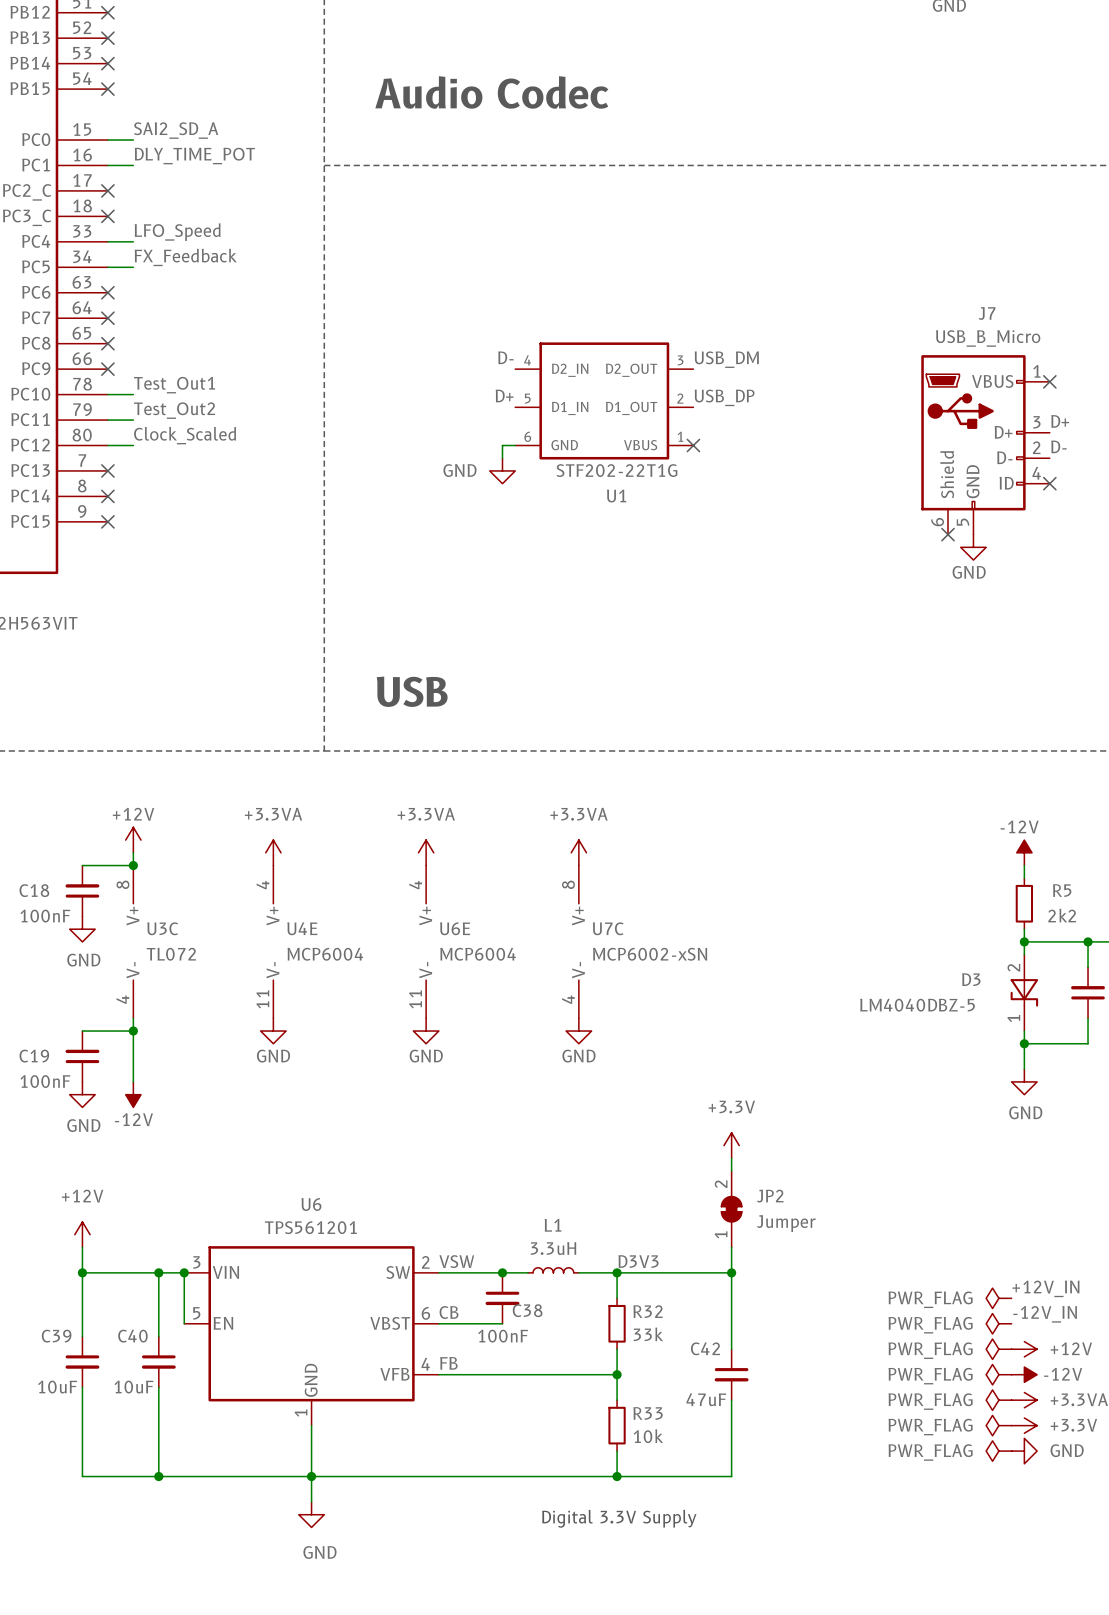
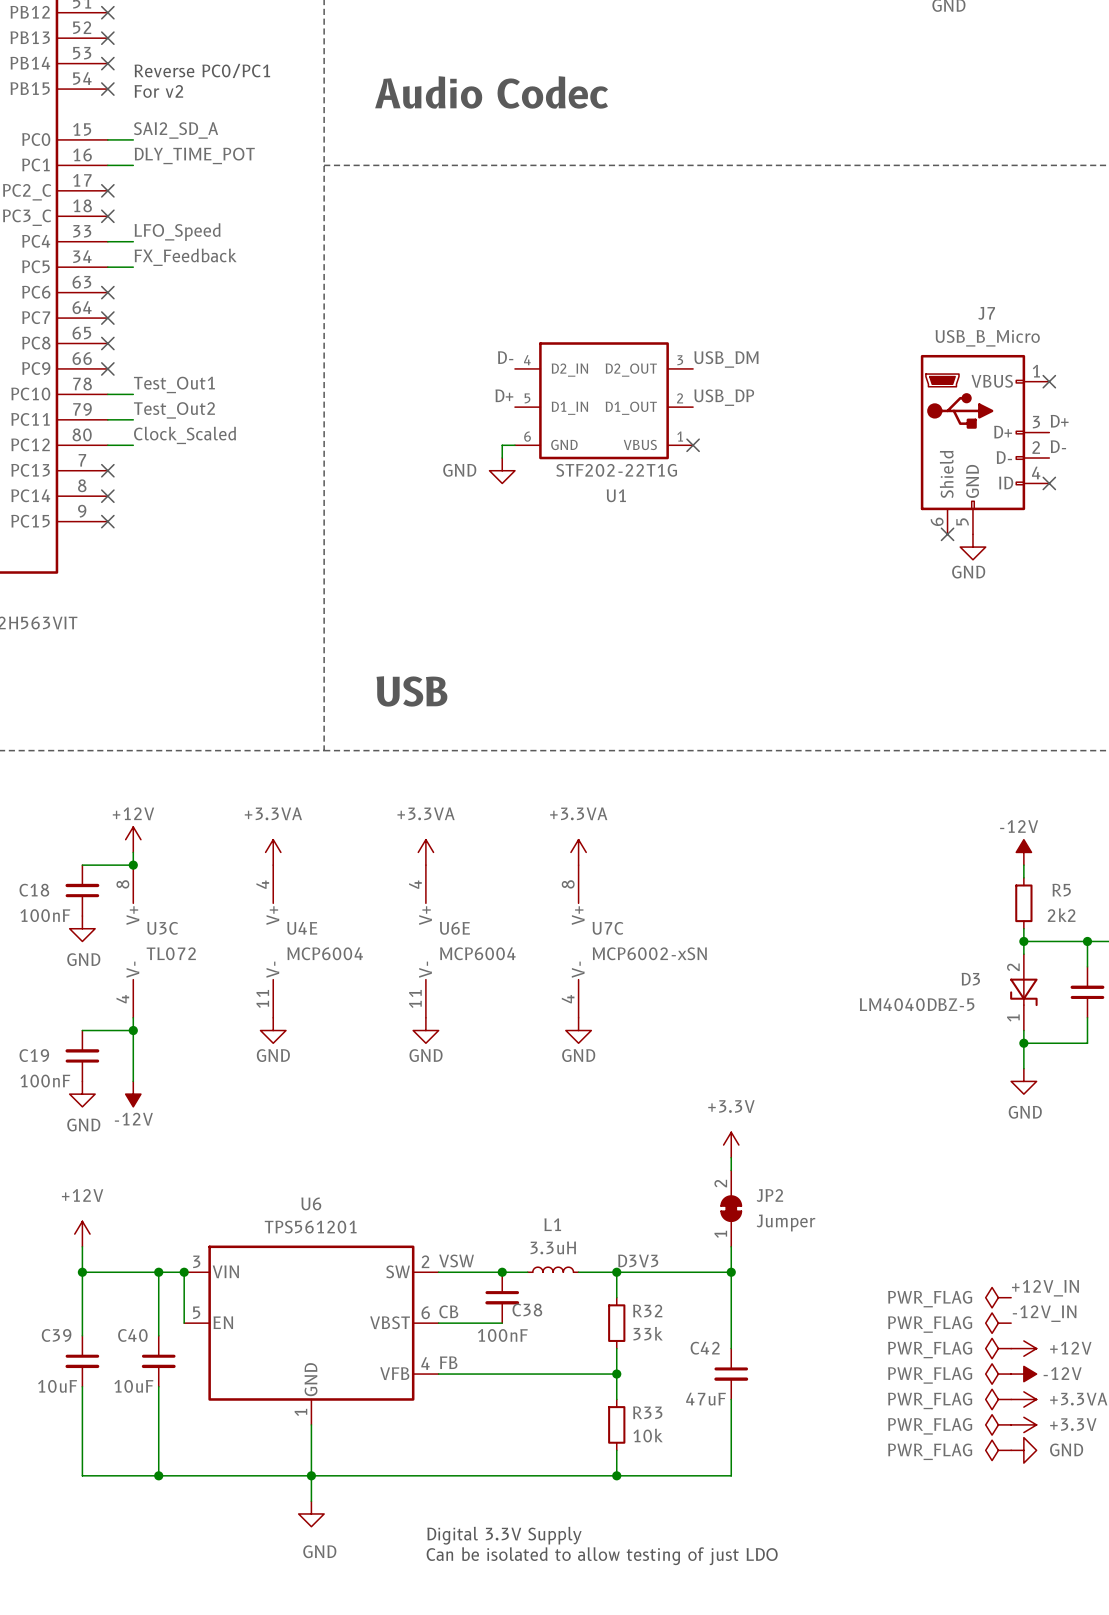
text: none -> Reverse PC0/PC1 (202, 70)
text: none -> For v2 (158, 91)
text position: Digital 3.3V Supply (619, 1518) -> Digital 3.3V Supply (504, 1535)
text: none -> Can be isolated to allow testing of just LDO (602, 1556)

